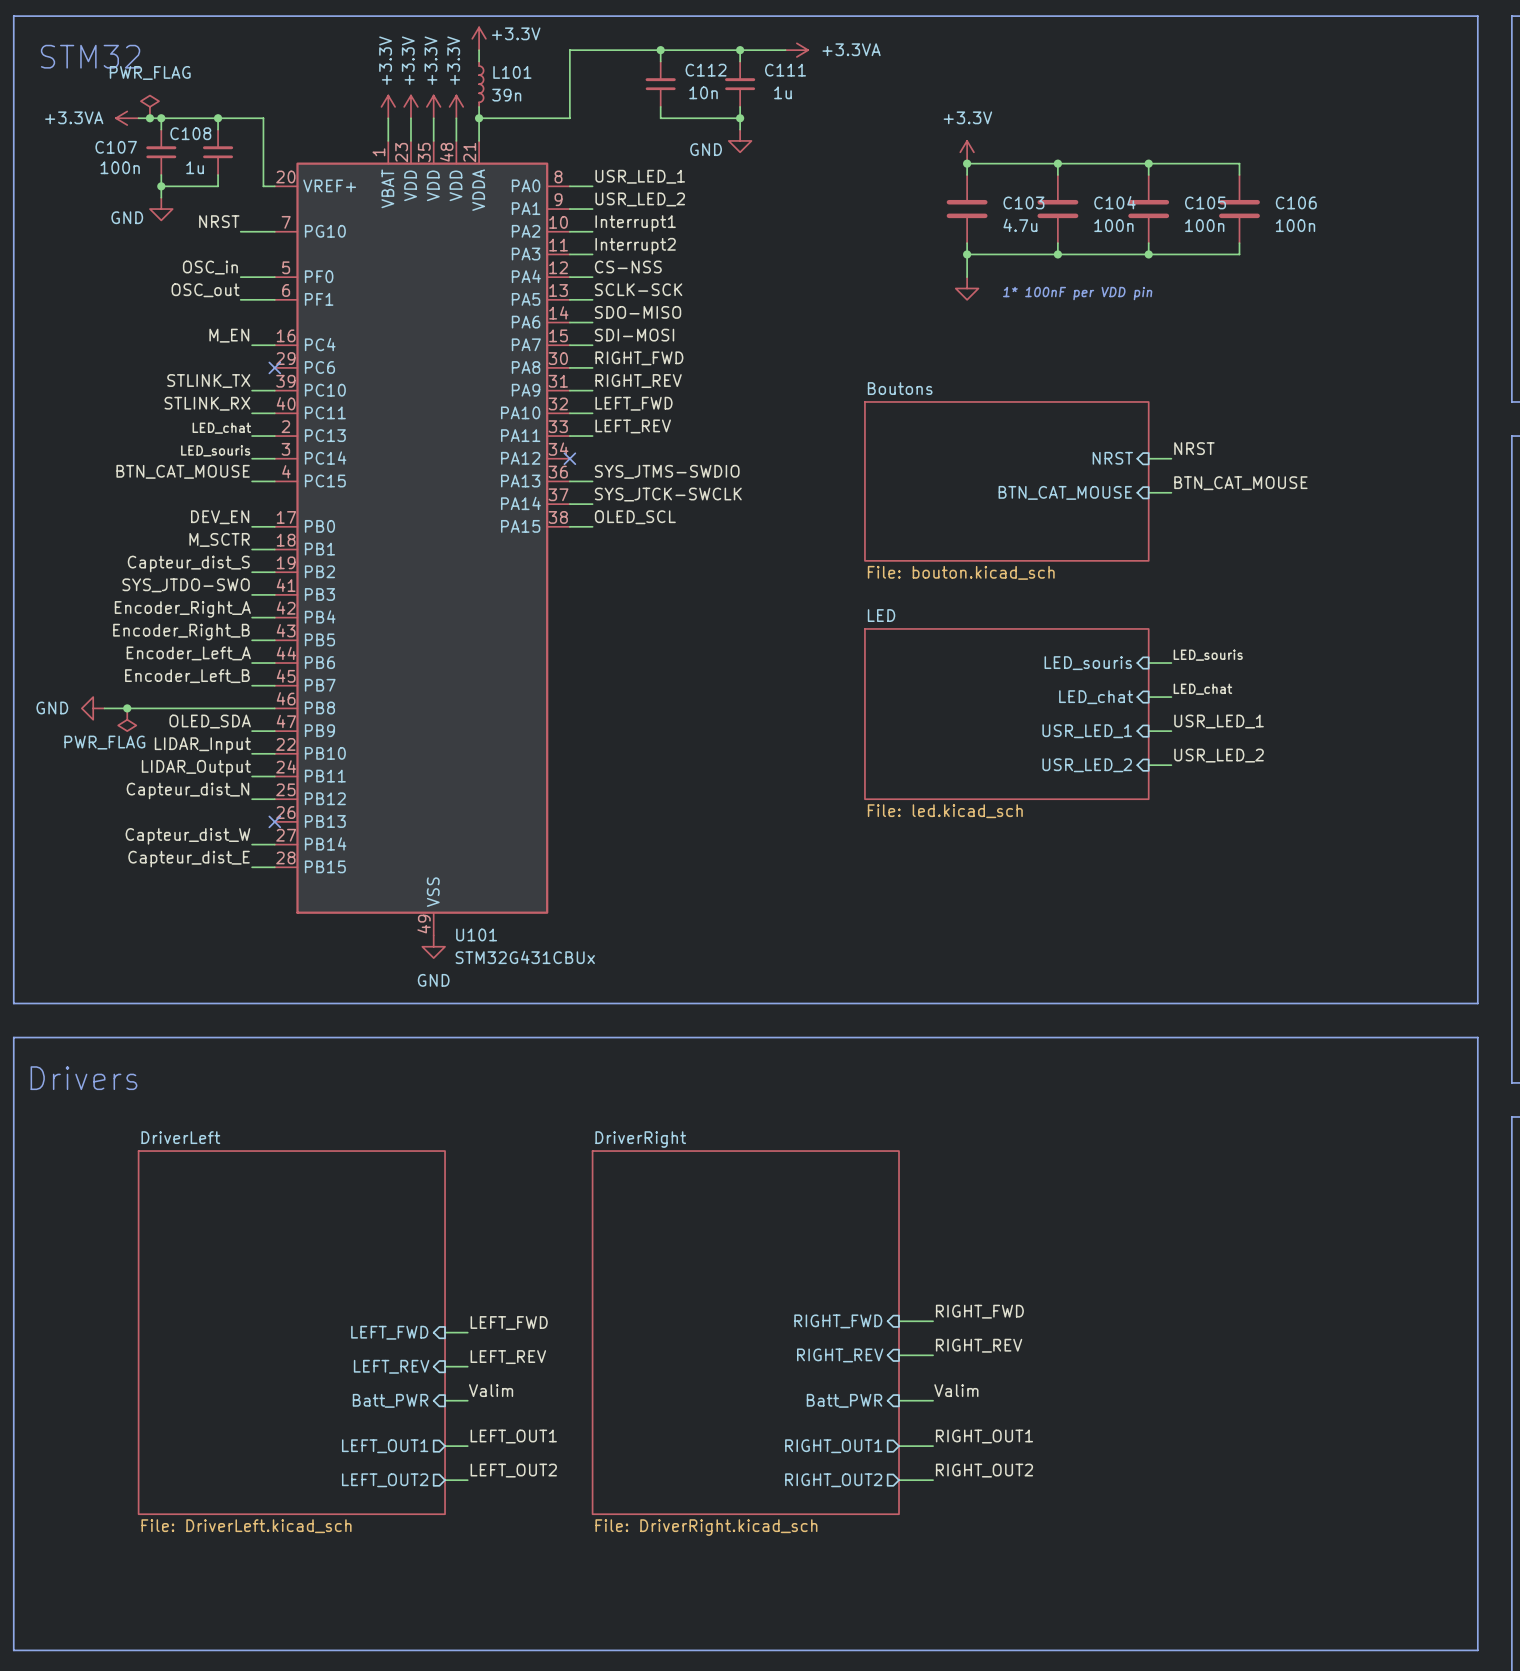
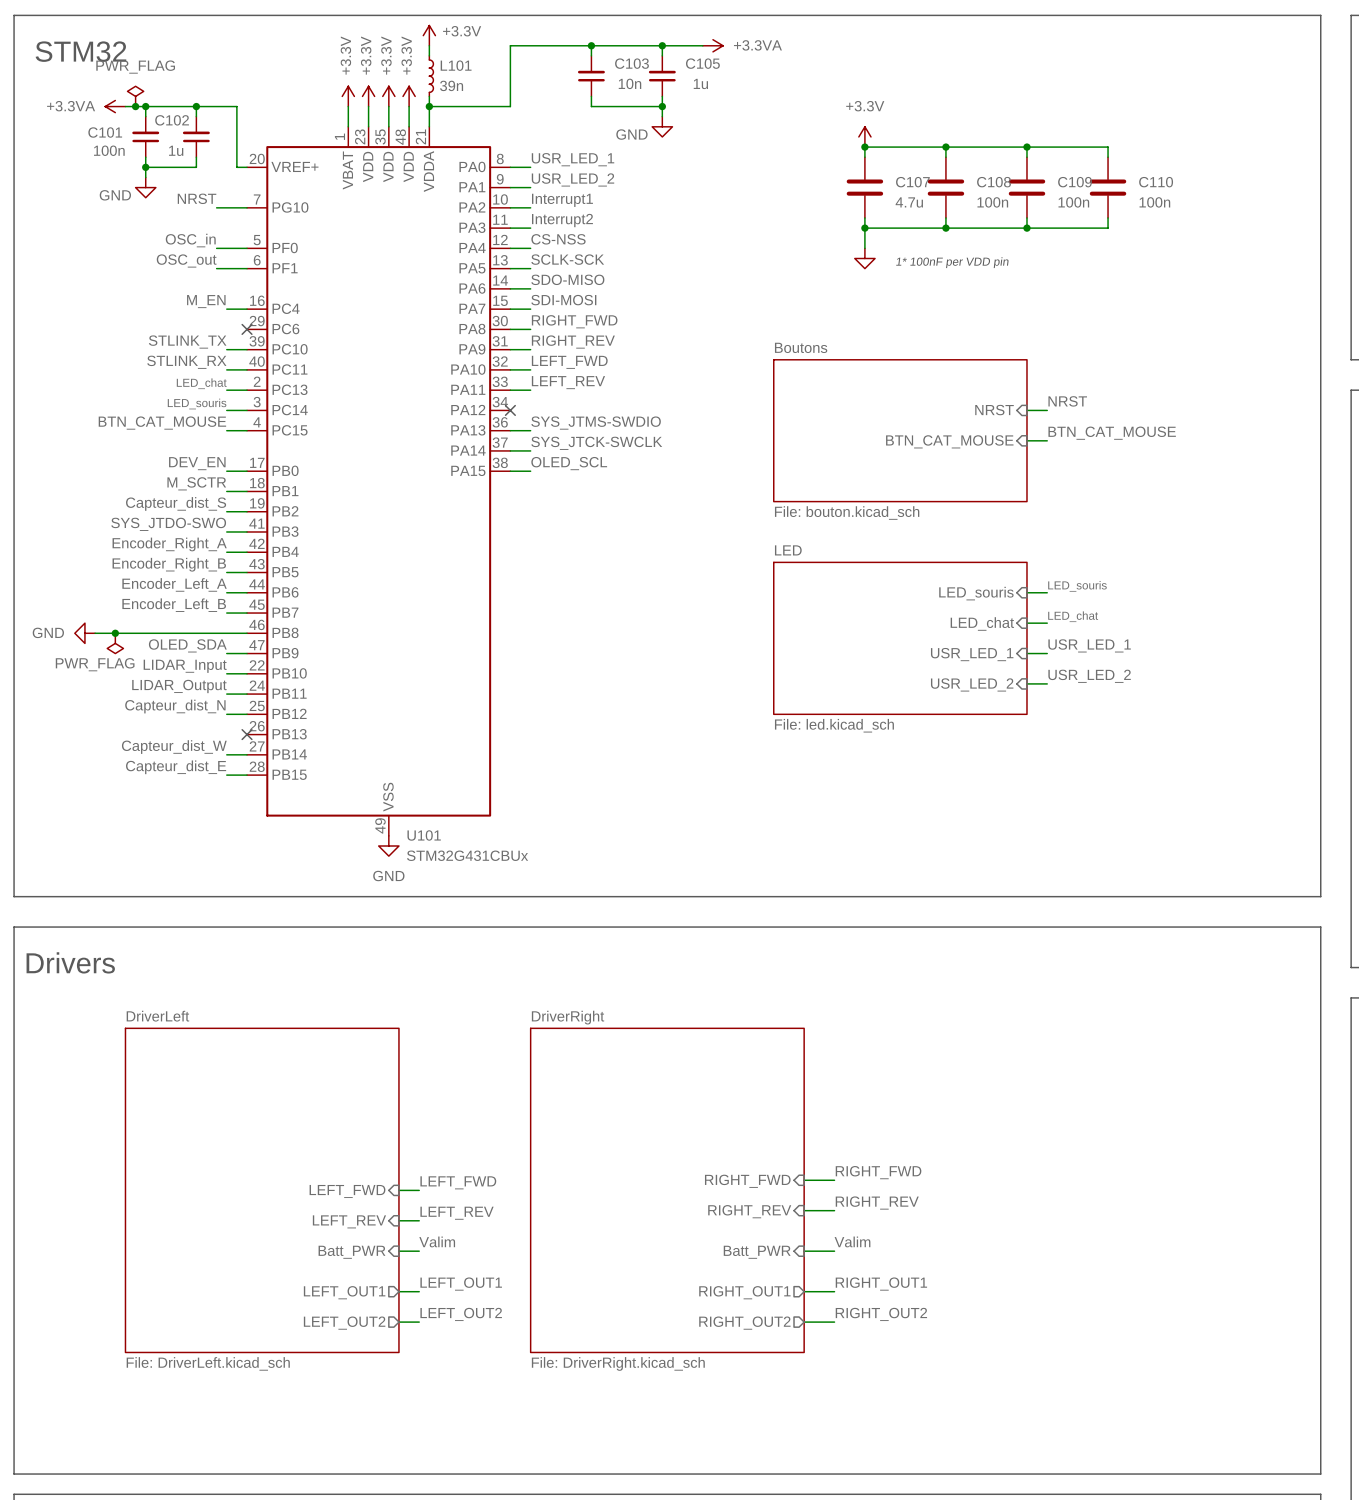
C112 name: C112 (706, 70) -> C103 (631, 63)
C111 name: C111 (785, 70) -> C105 (702, 63)
C108 name: C108 (190, 133) -> C102 (172, 120)
C107 name: C107 (116, 147) -> C101 (105, 132)
C103 name: C103 (1023, 202) -> C107 (912, 182)
C104 name: C104 (1115, 202) -> C108 (993, 182)
C105 name: C105 (1205, 202) -> C109 (1075, 182)
C106 name: C106 (1296, 202) -> C110 (1156, 182)

